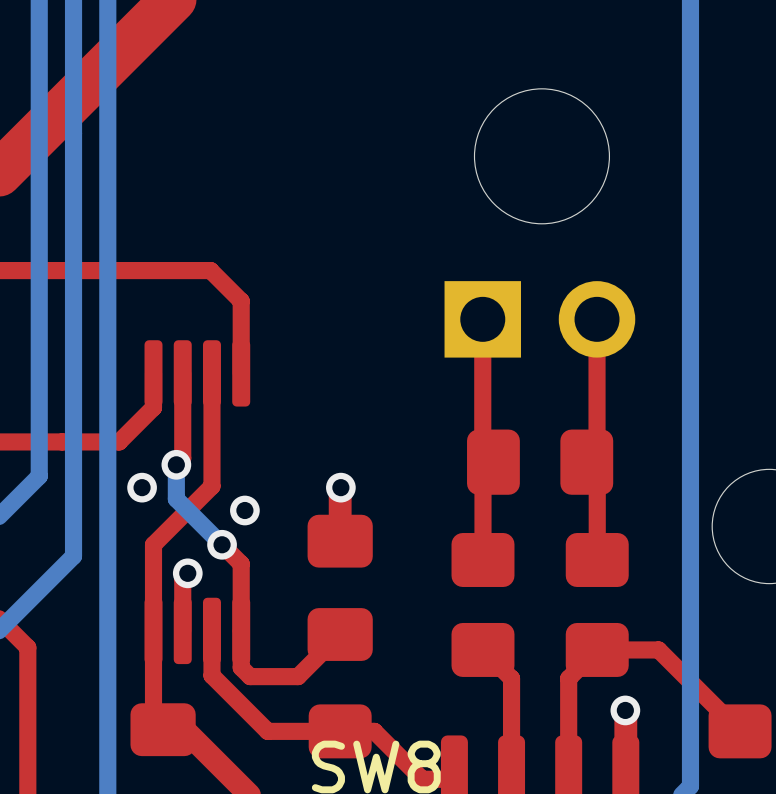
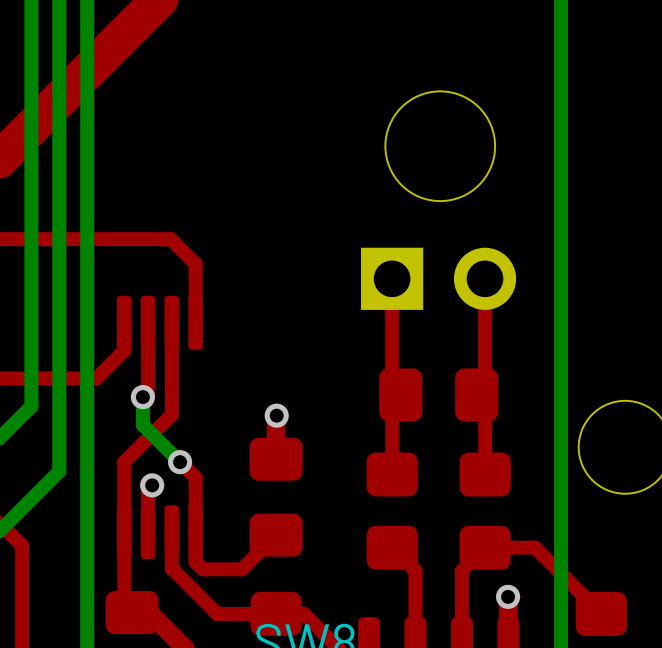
via: (142, 487) -> none
via: (244, 510) -> none

